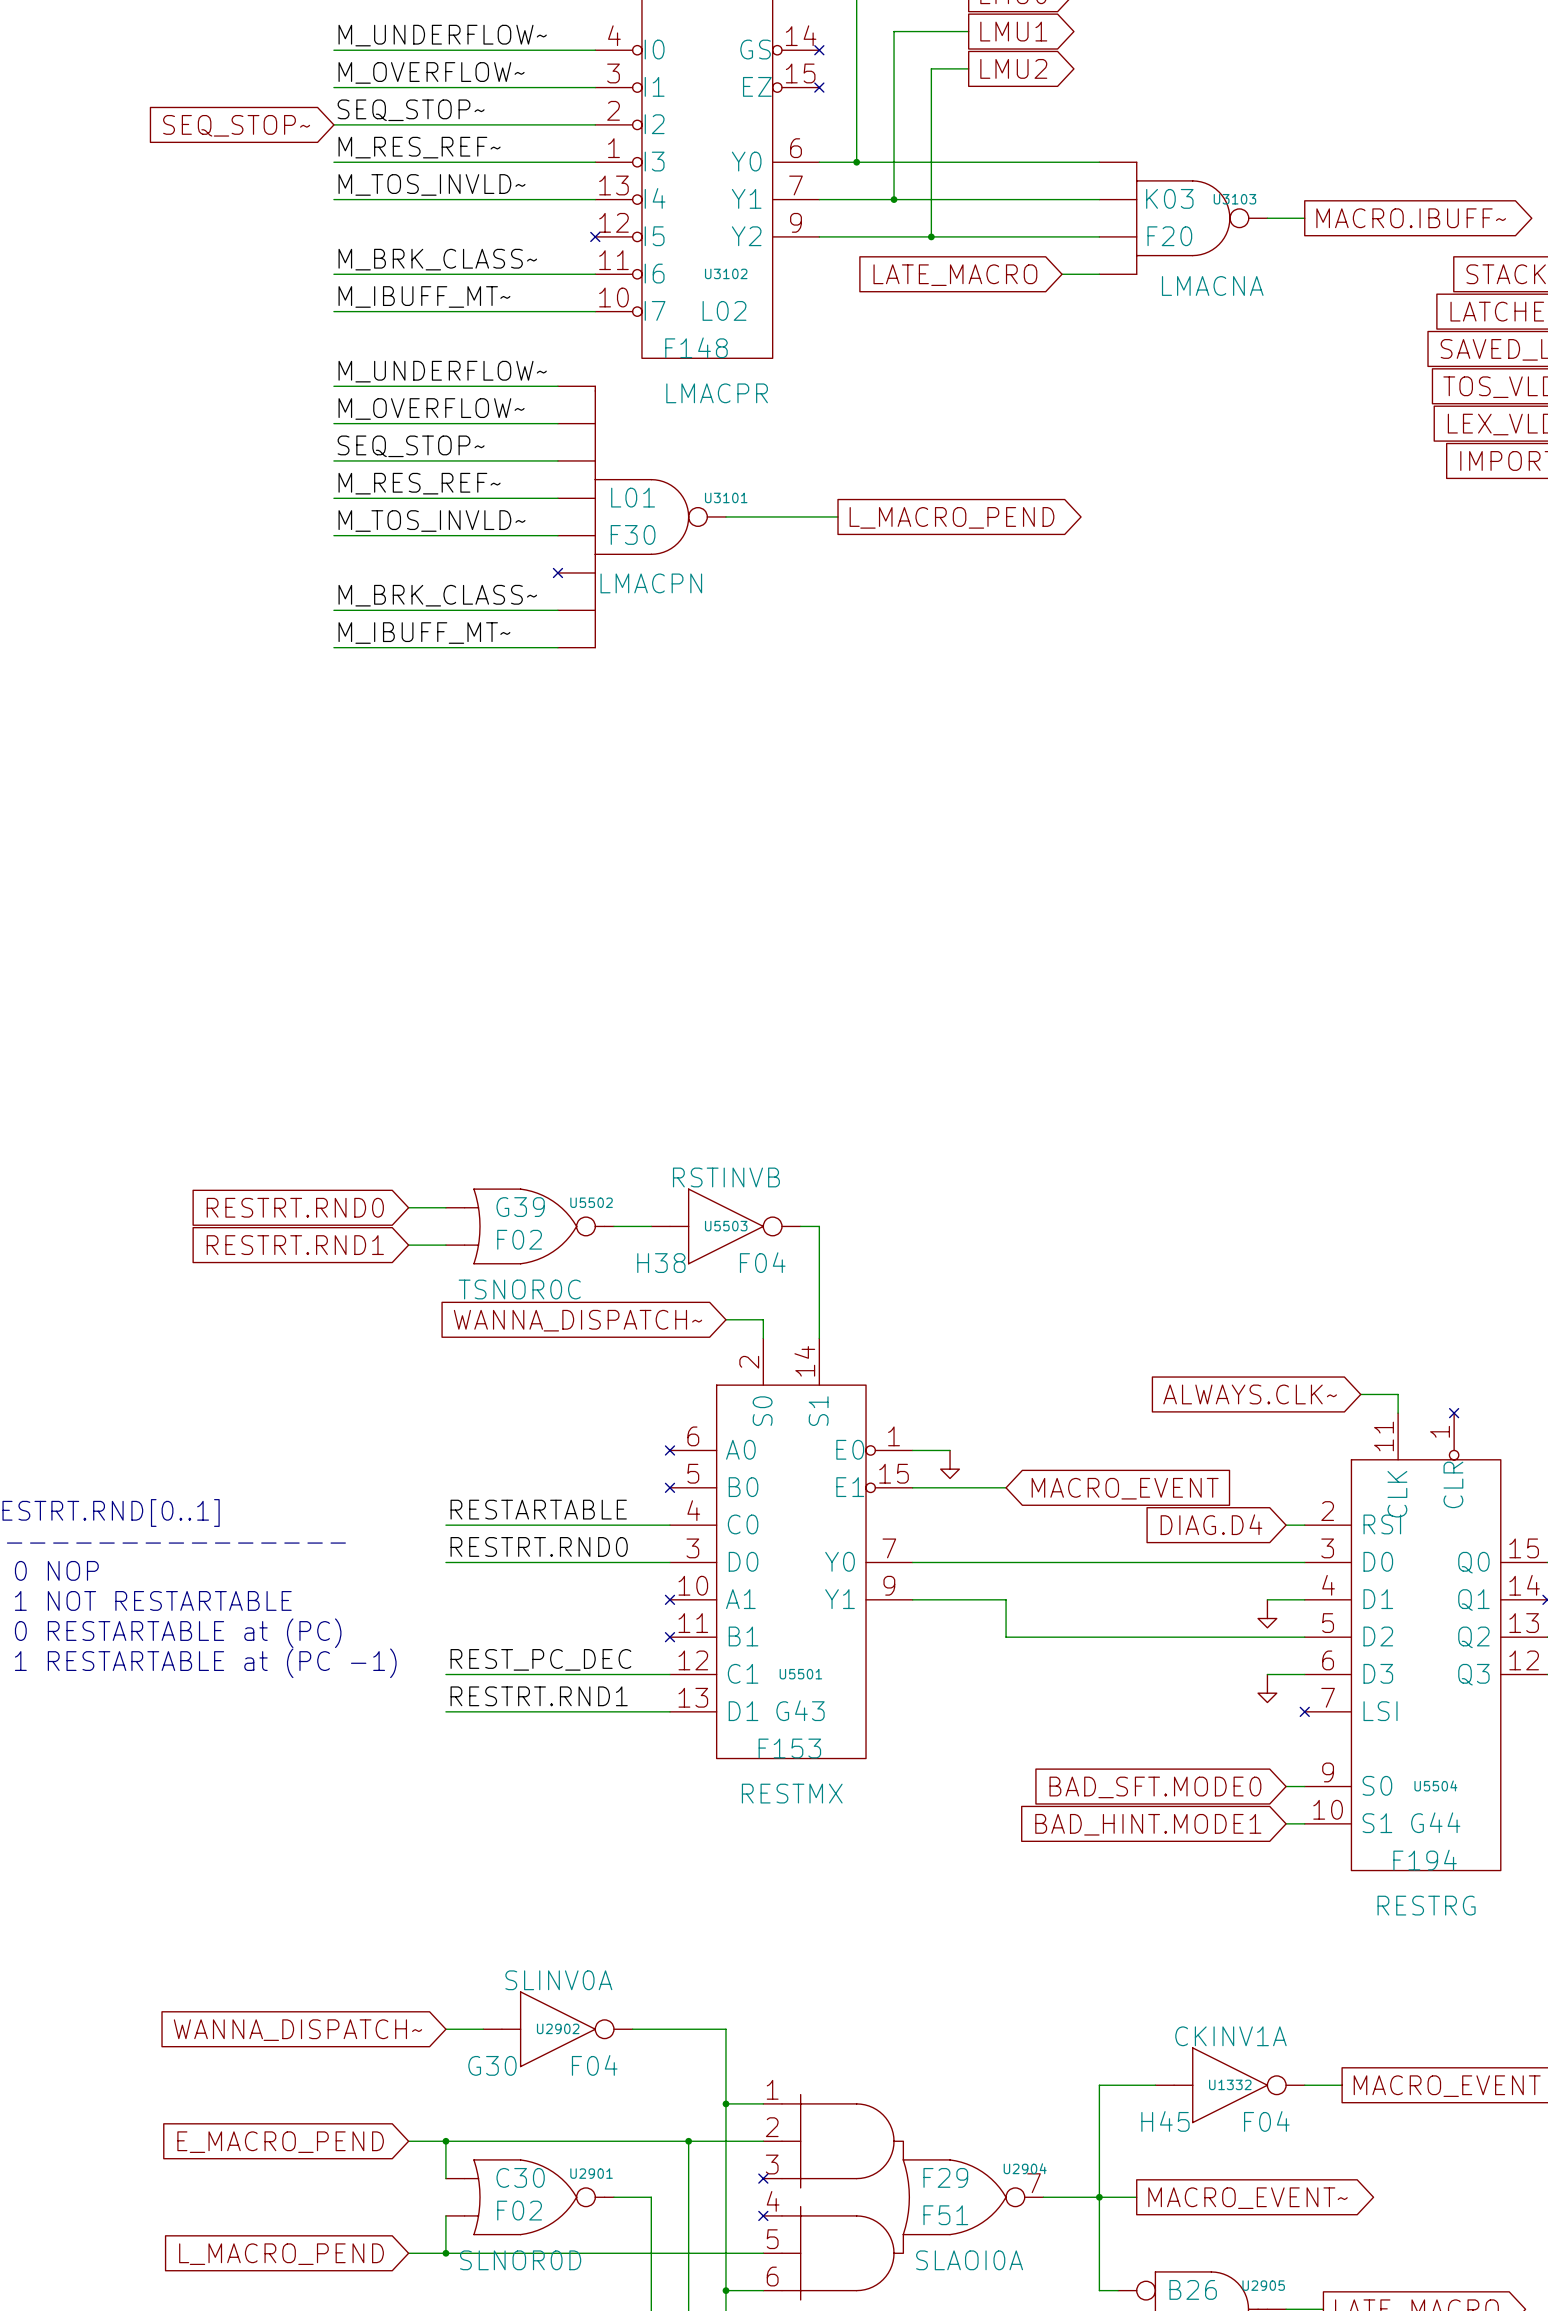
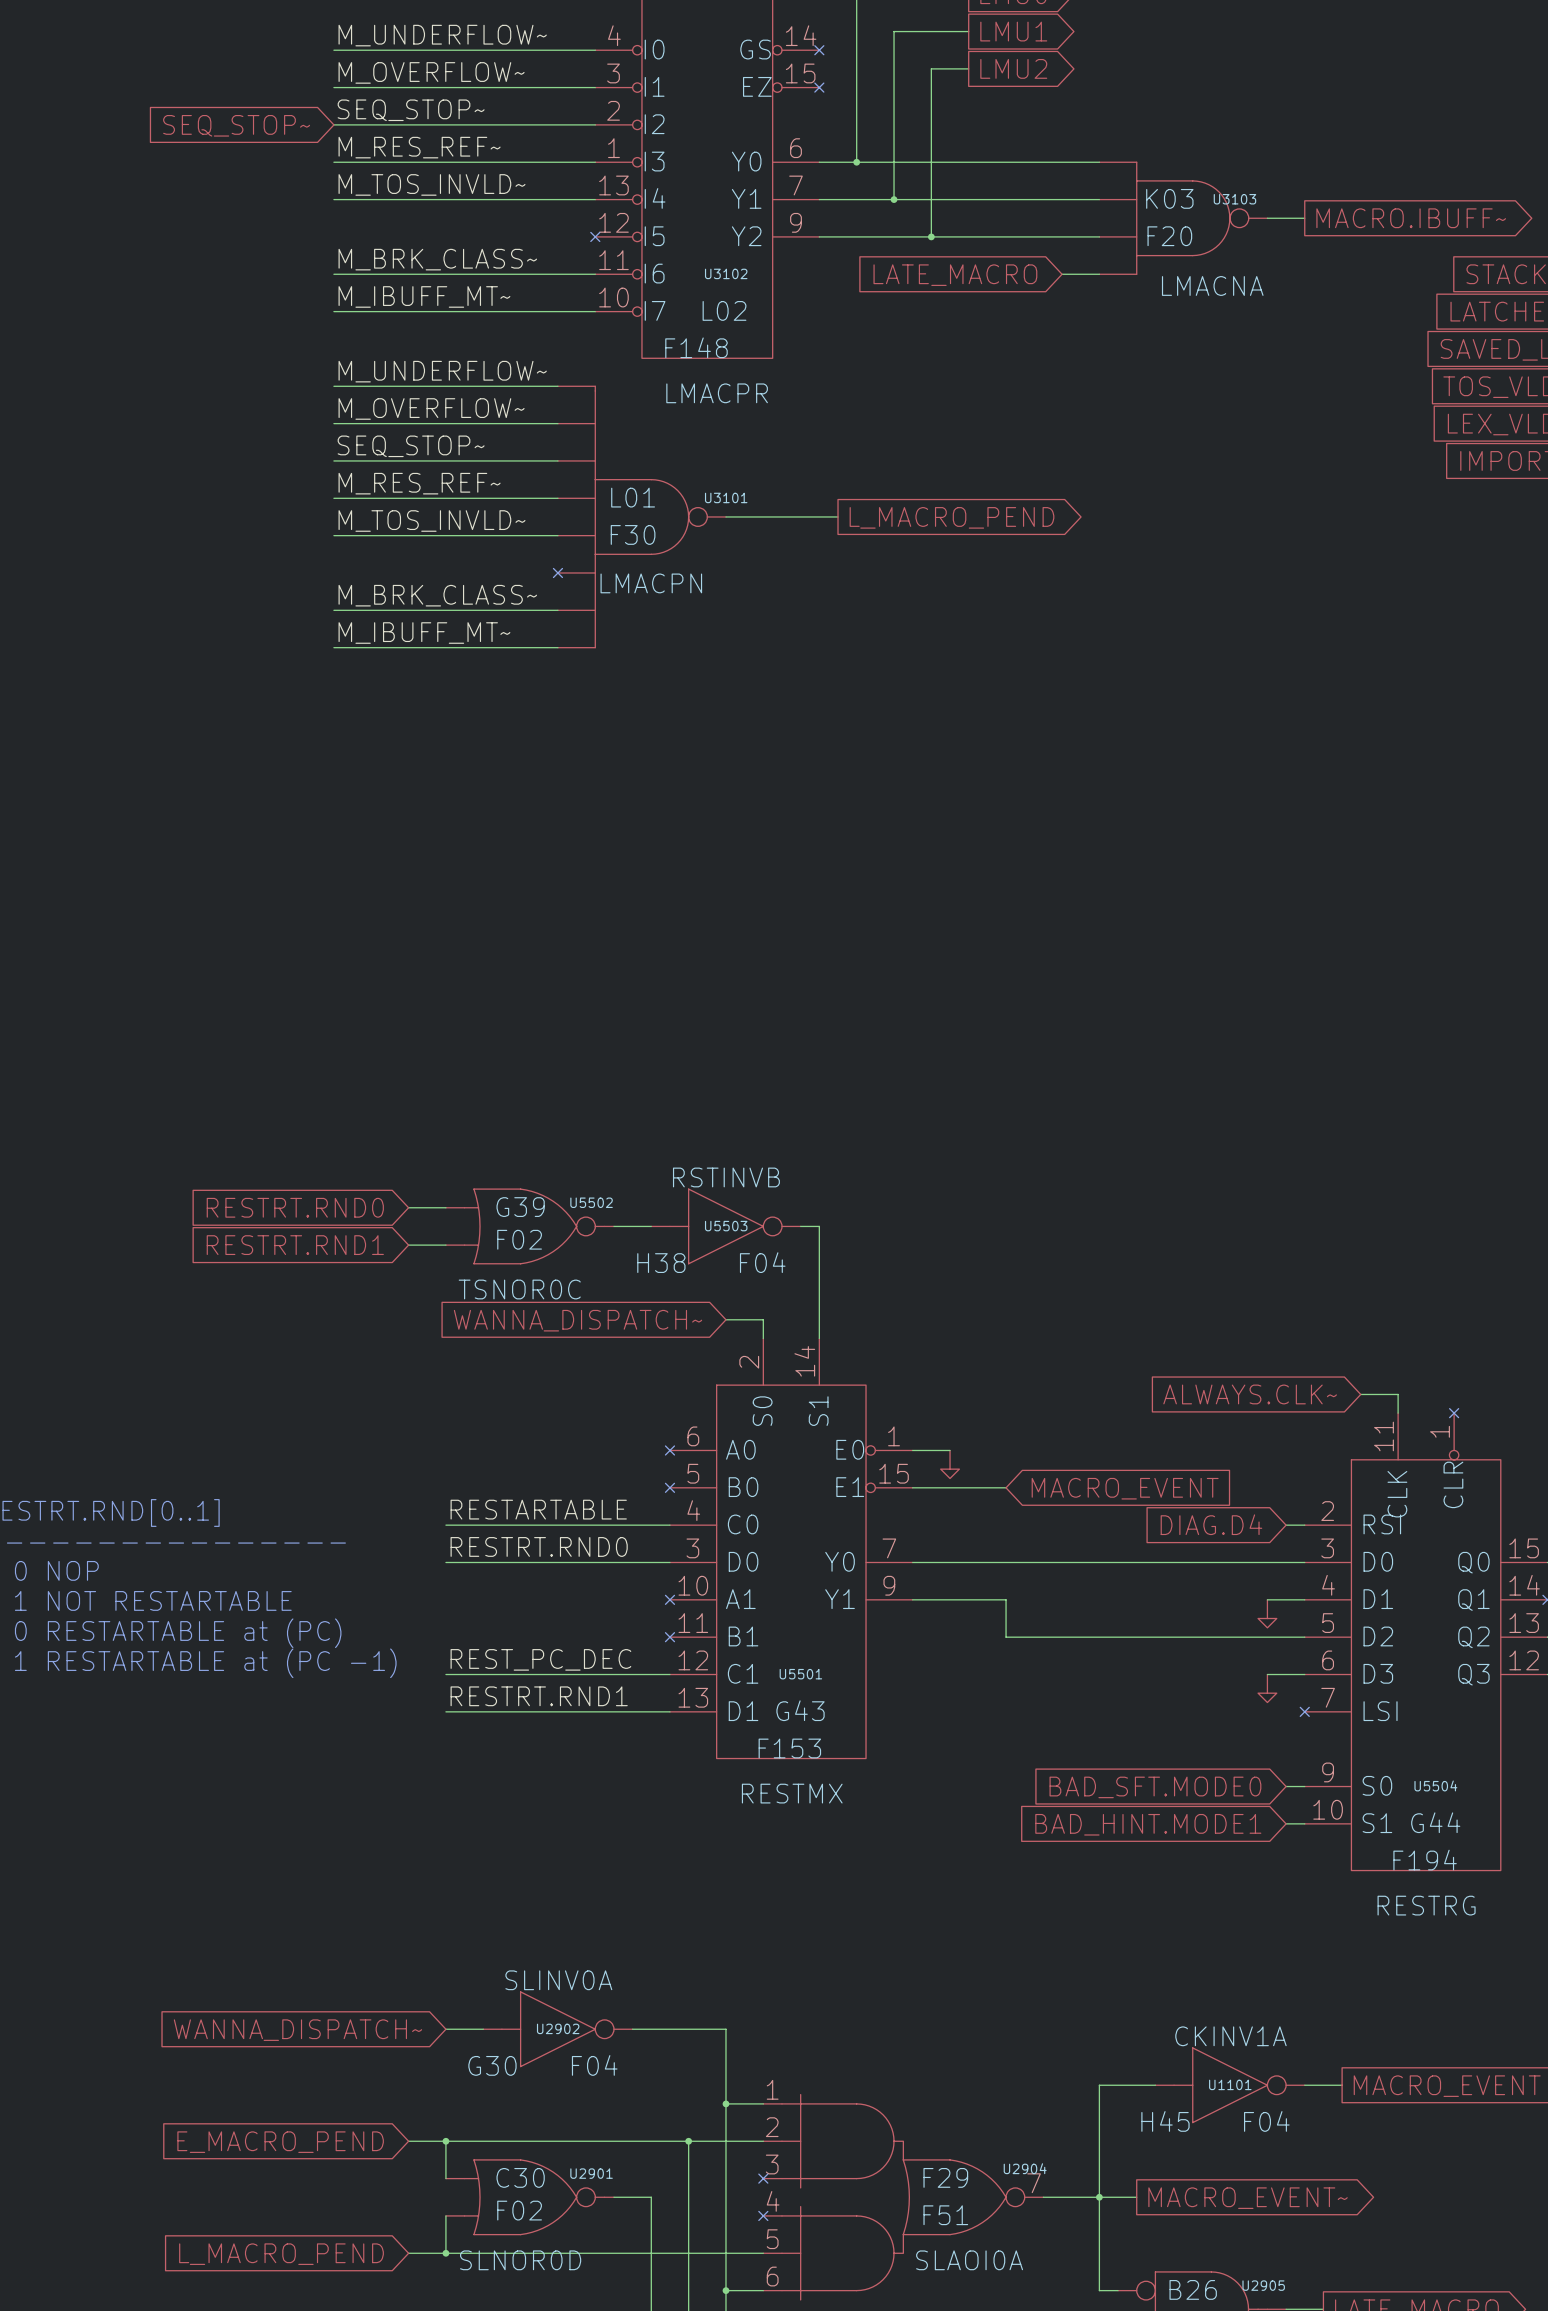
U1332 name: U1332 (1230, 2084) -> U1101 (1230, 2084)

